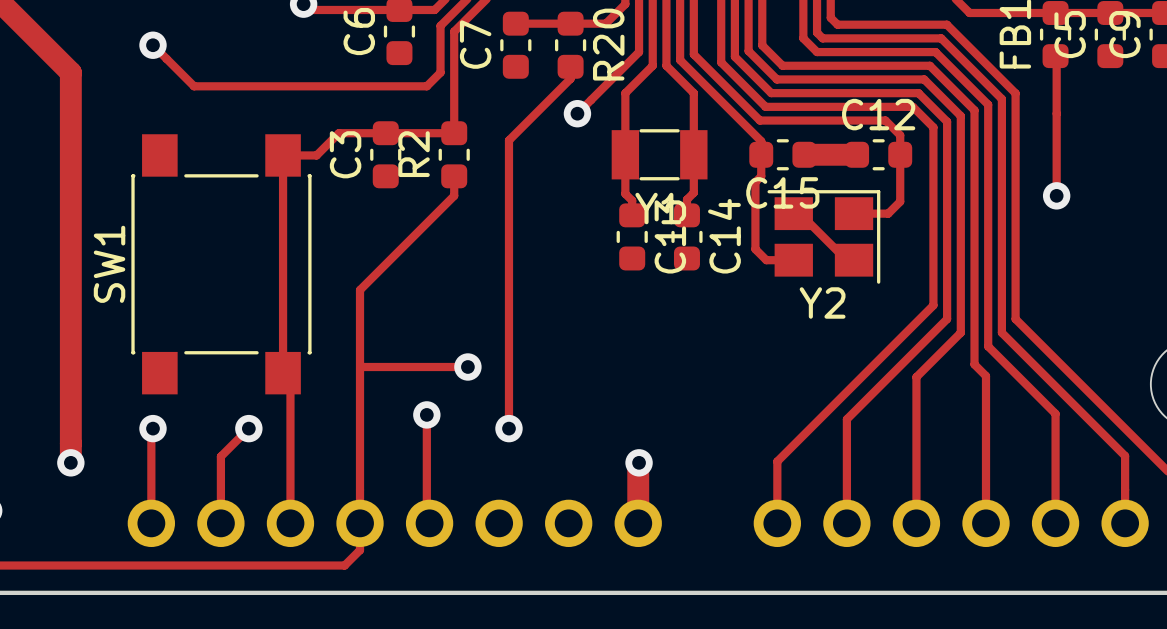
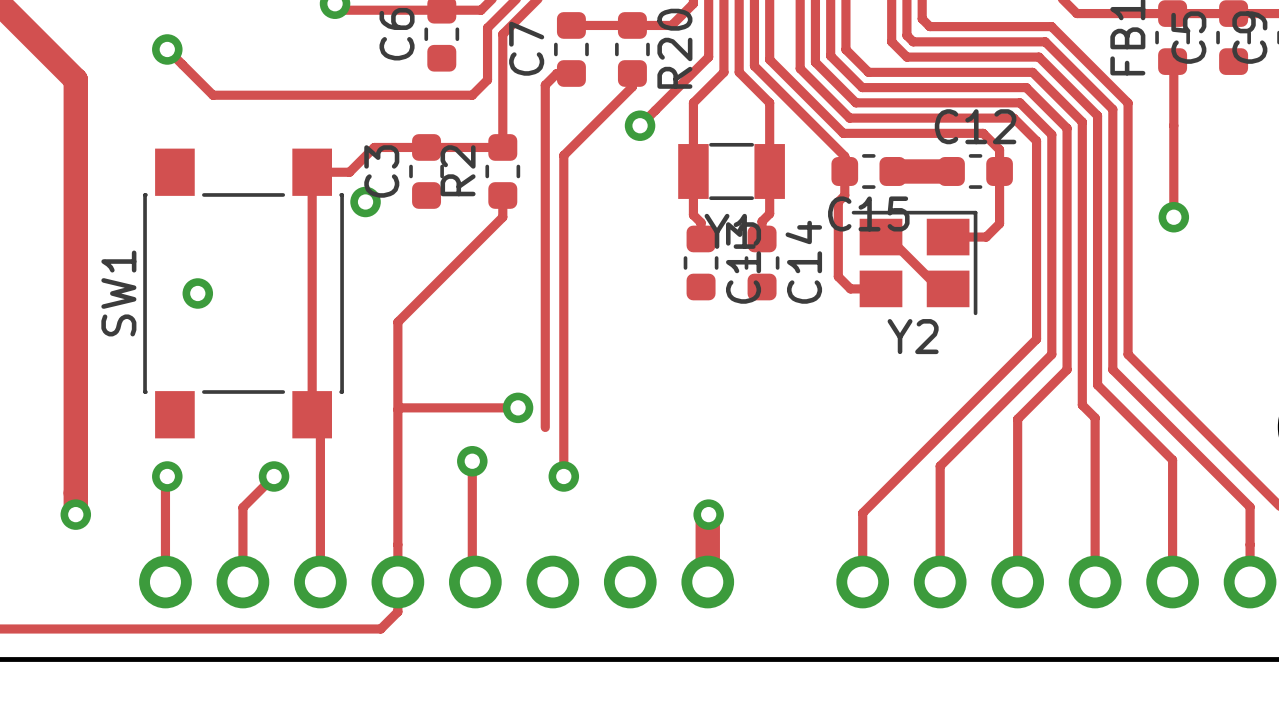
track: none -> (571, 73) (556, 73) (545, 85) (545, 427)
via: none -> (365, 201)
via: none -> (197, 293)

